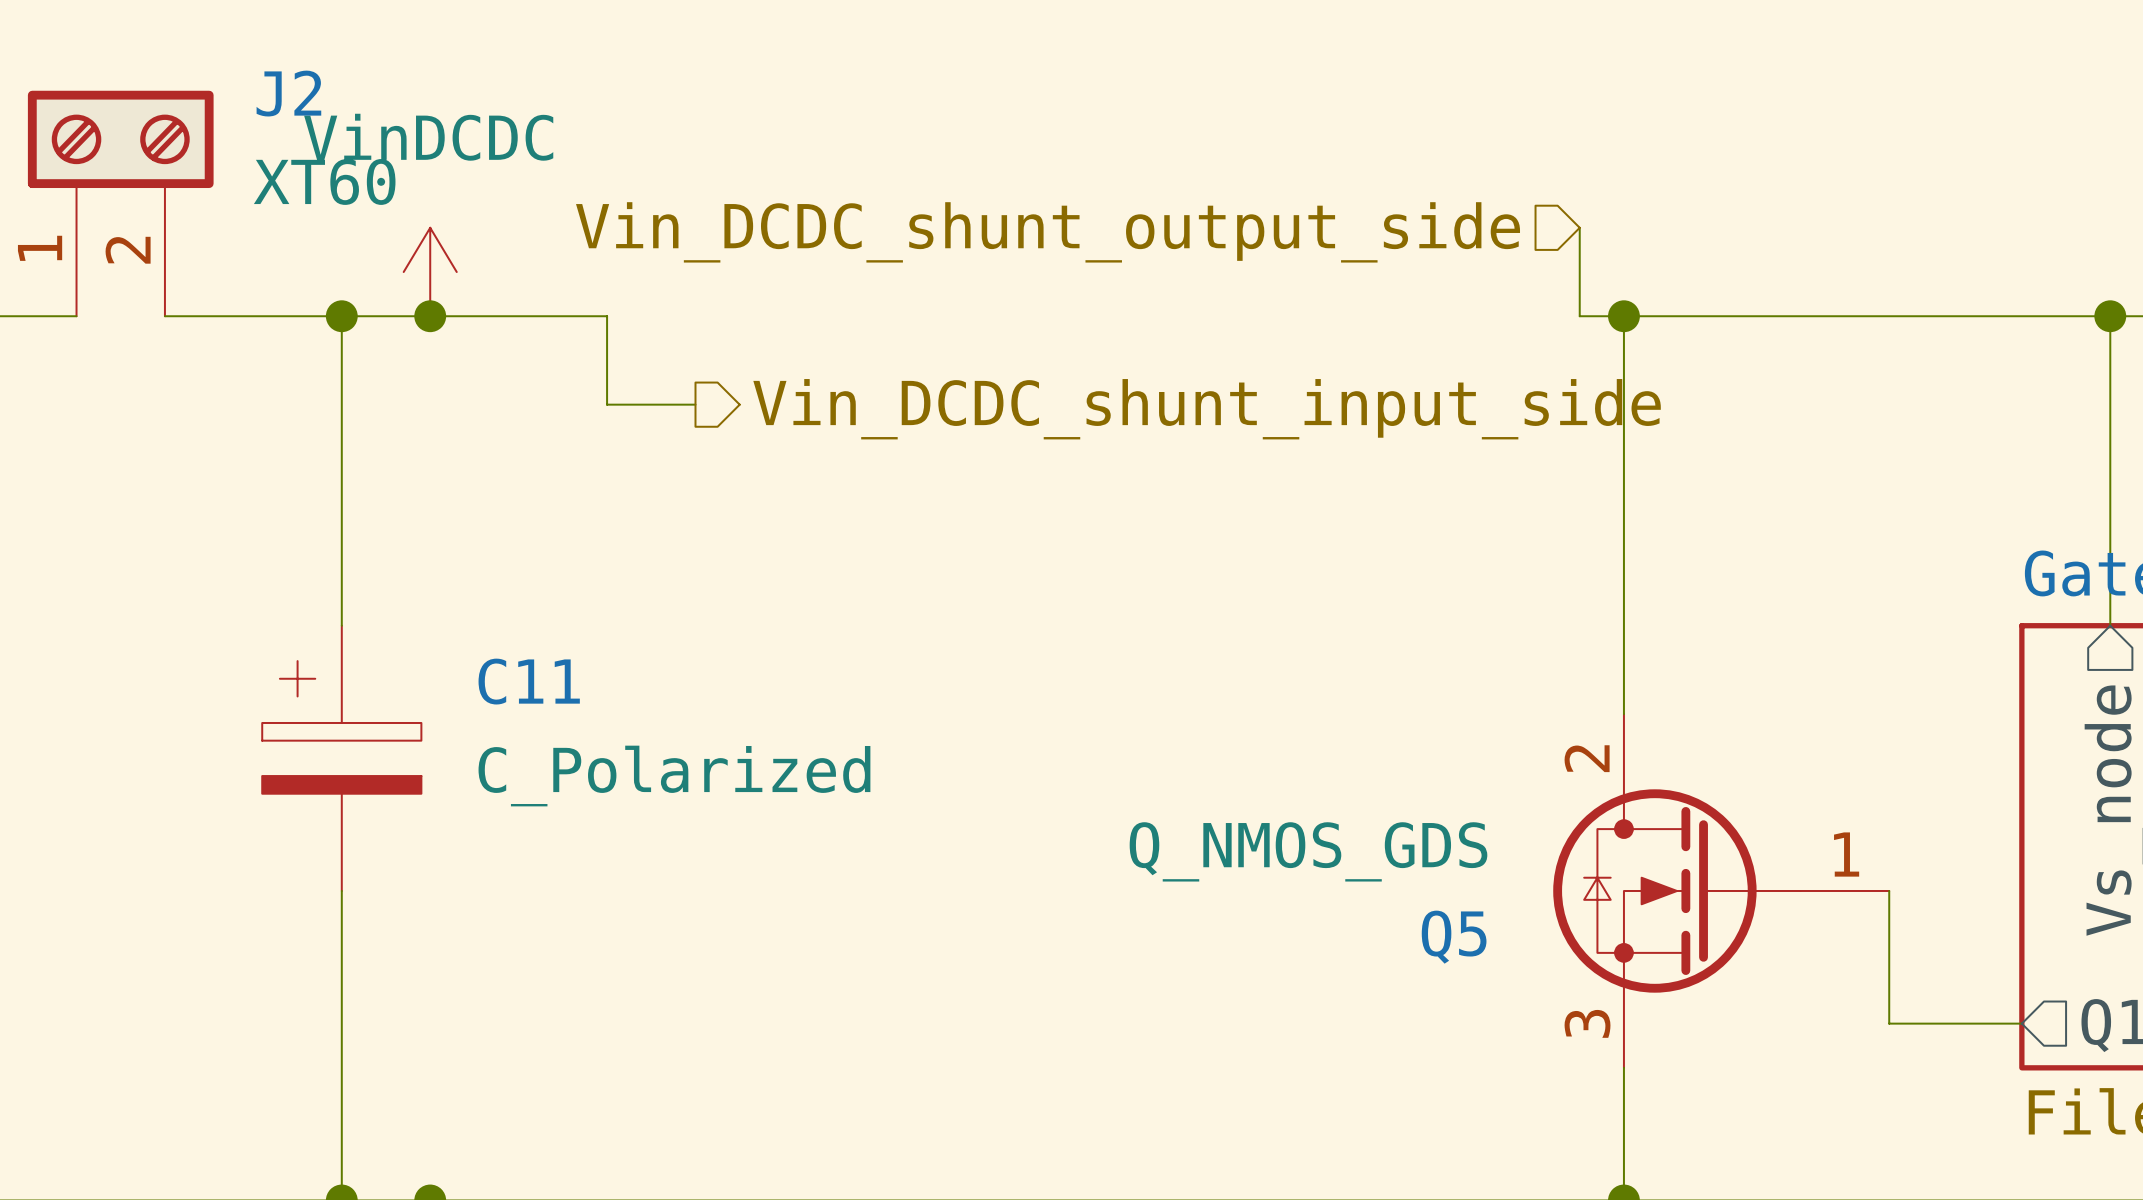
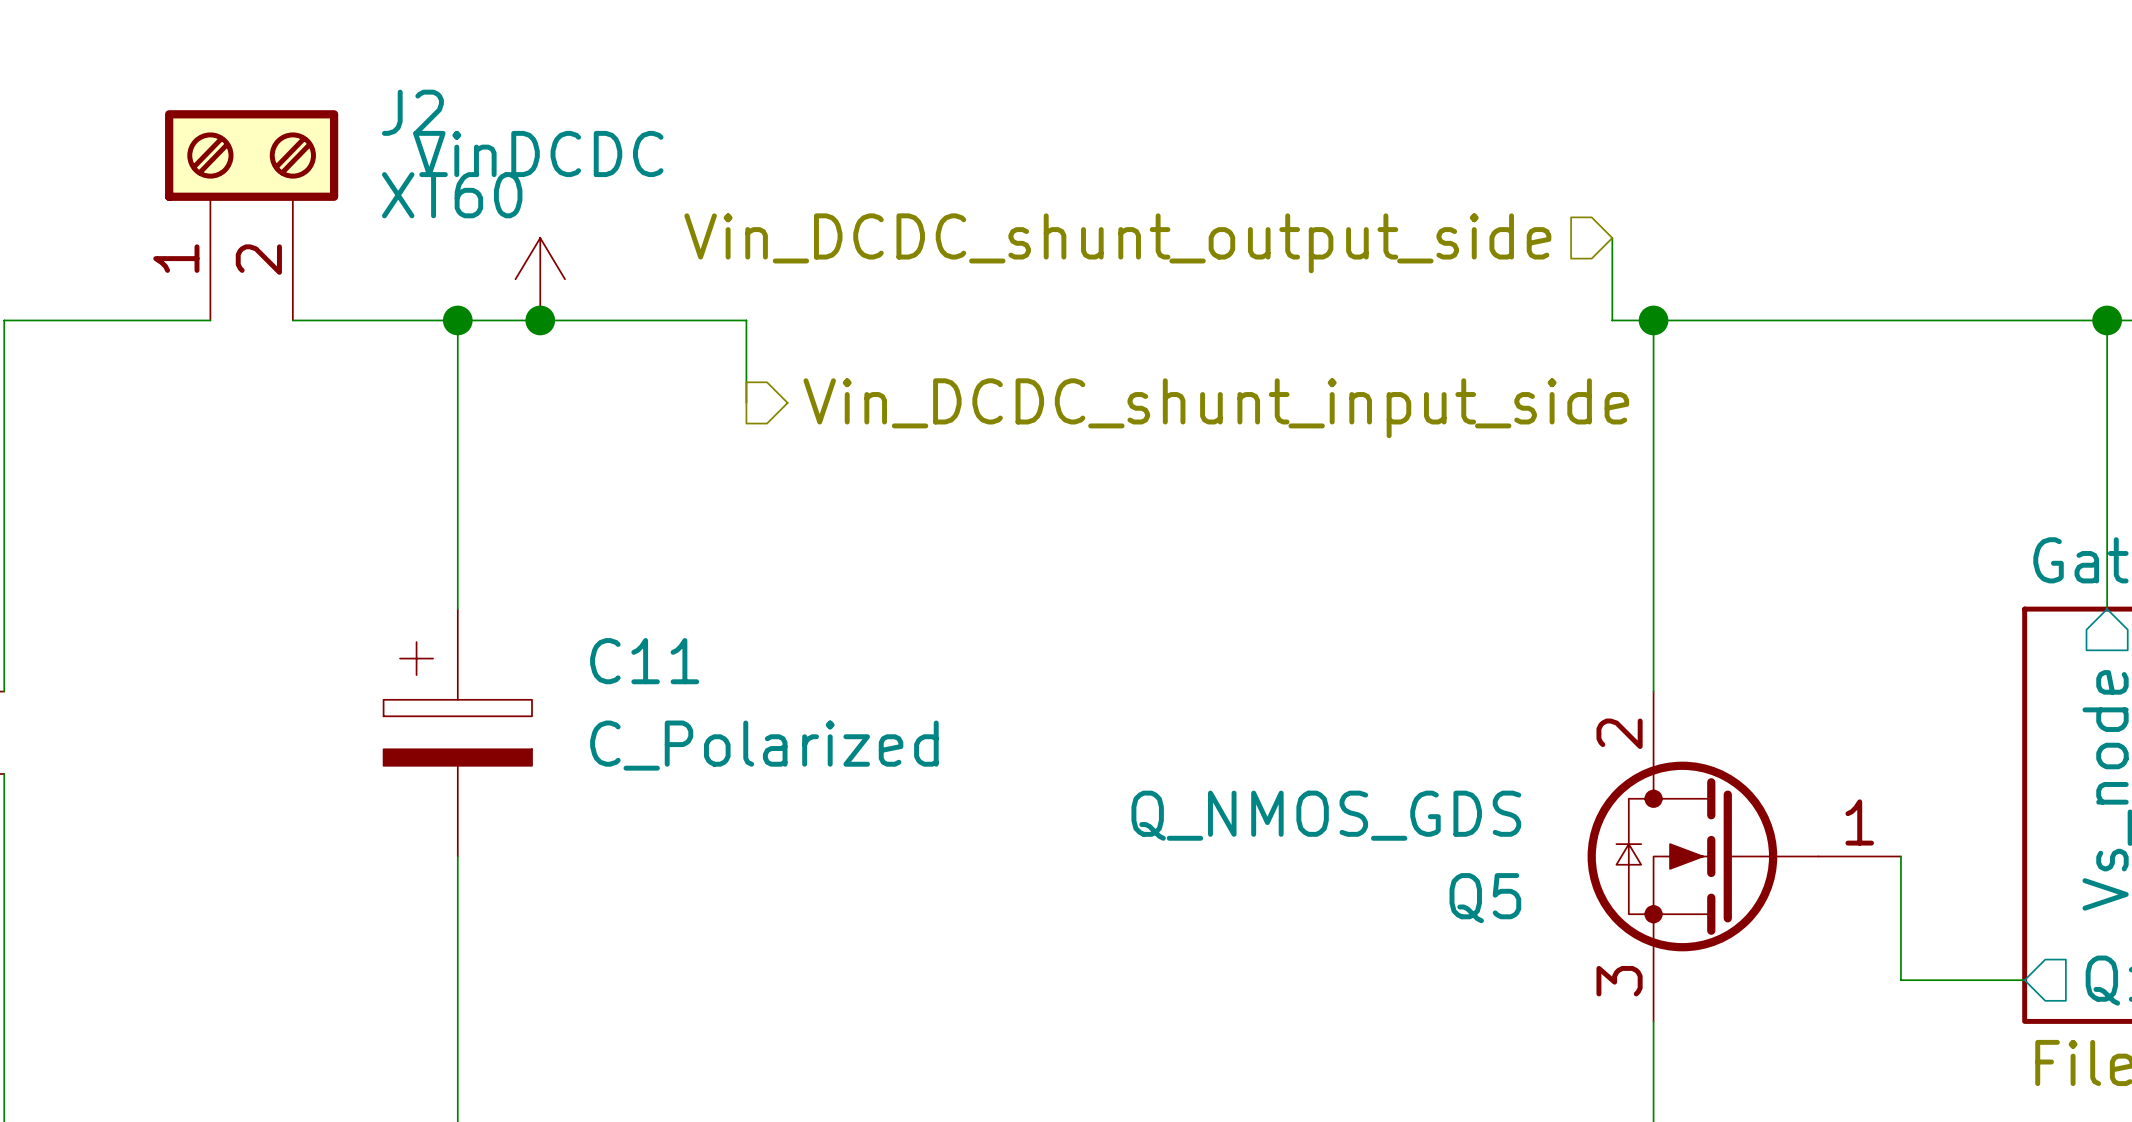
wire: (607, 316) (607, 404) (695, 404) -> (705, 320) (746, 320) (746, 402)
hierarchical label position: Vin_DCDC_shunt_input_side (1207, 409) -> Vin_DCDC_shunt_input_side (1216, 408)

